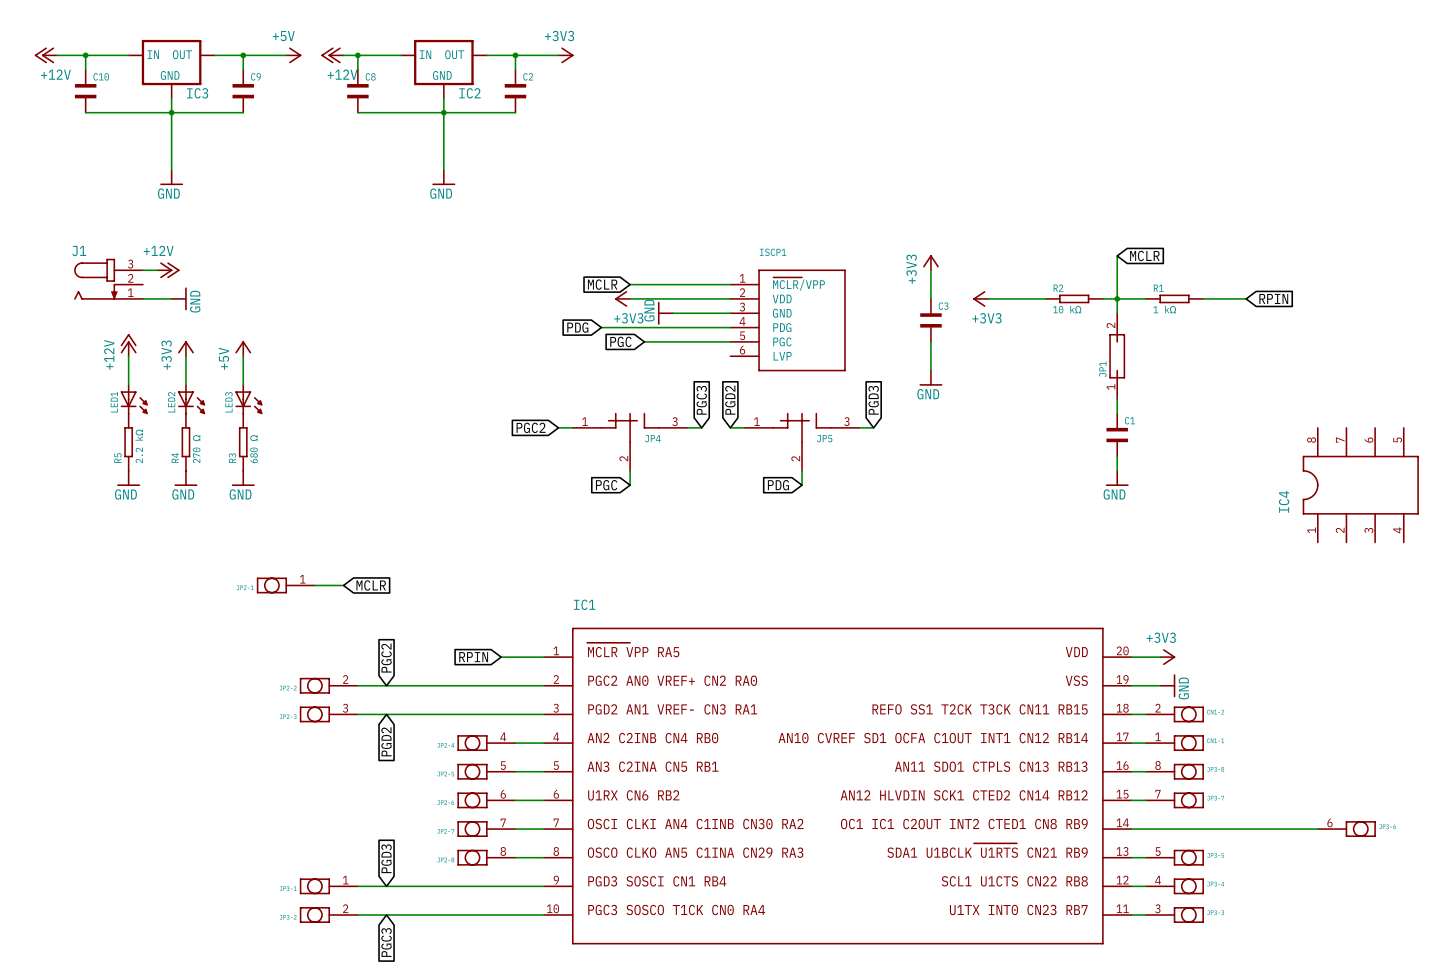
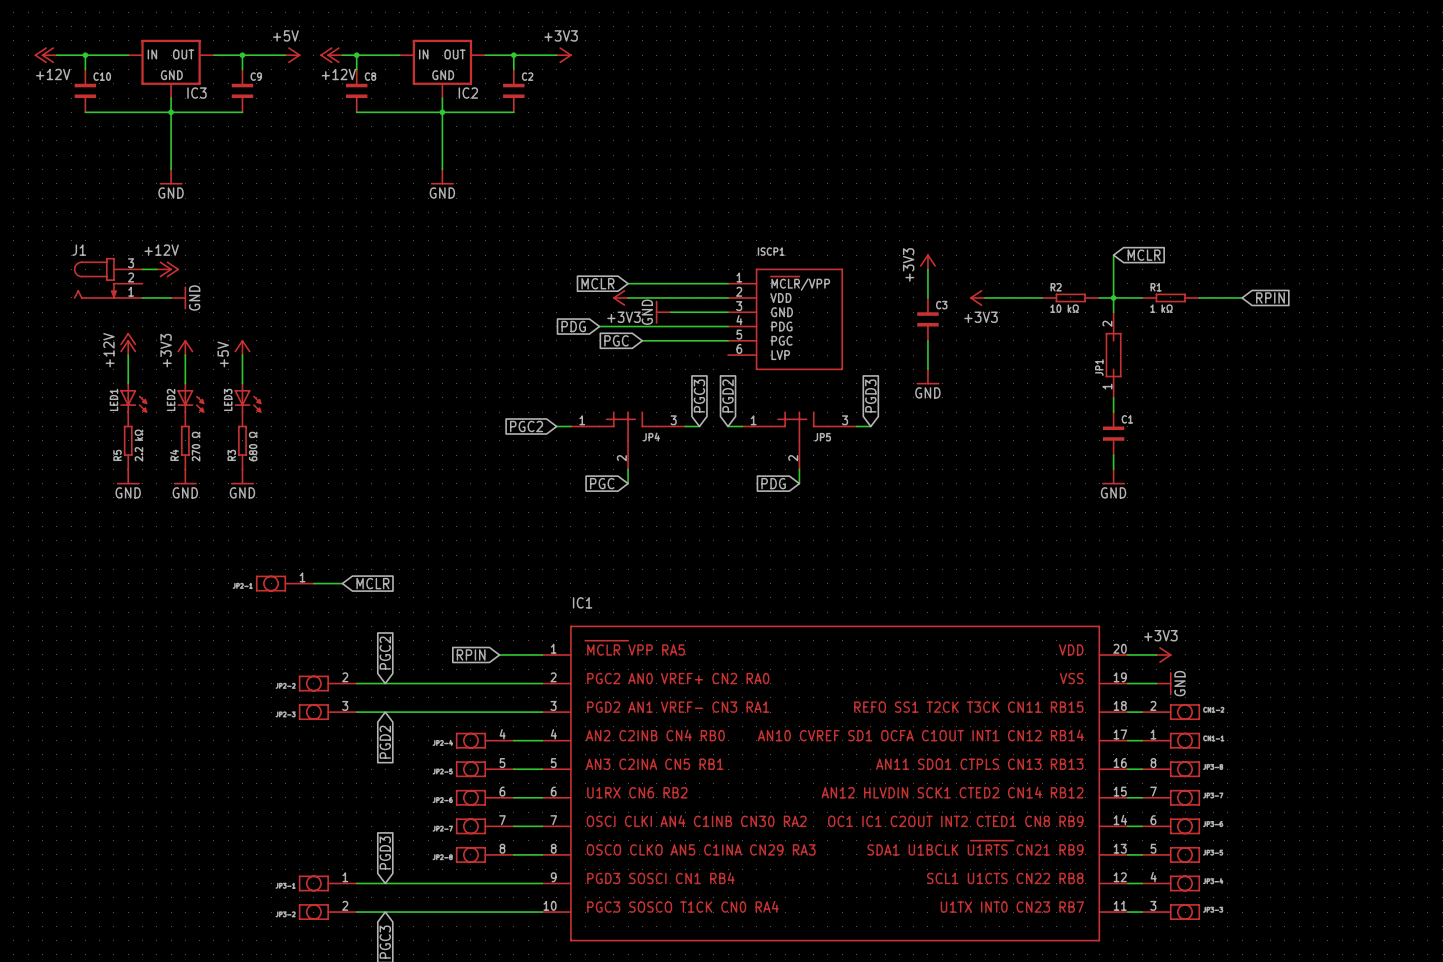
IC4: (1360, 485) -> none
wire: (1145, 829) (1317, 829) -> none
part position: (1346, 829) -> (1171, 826)

